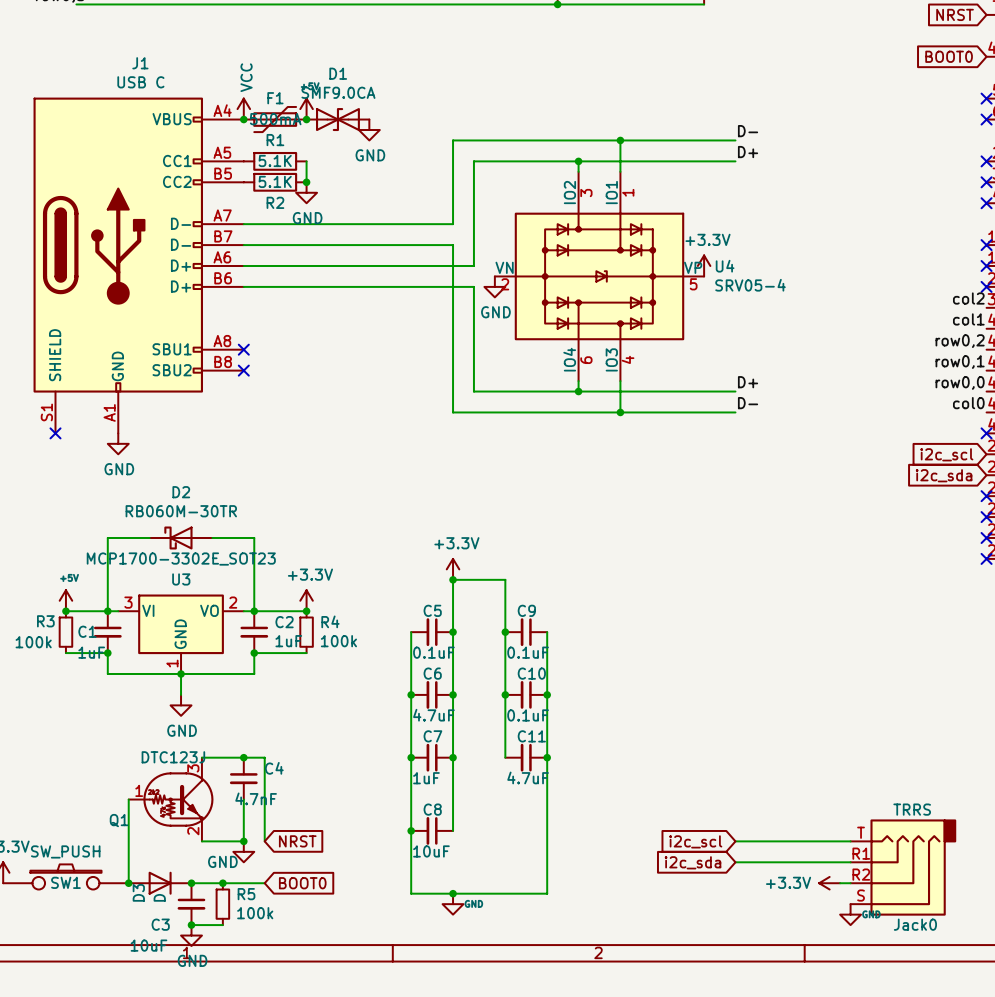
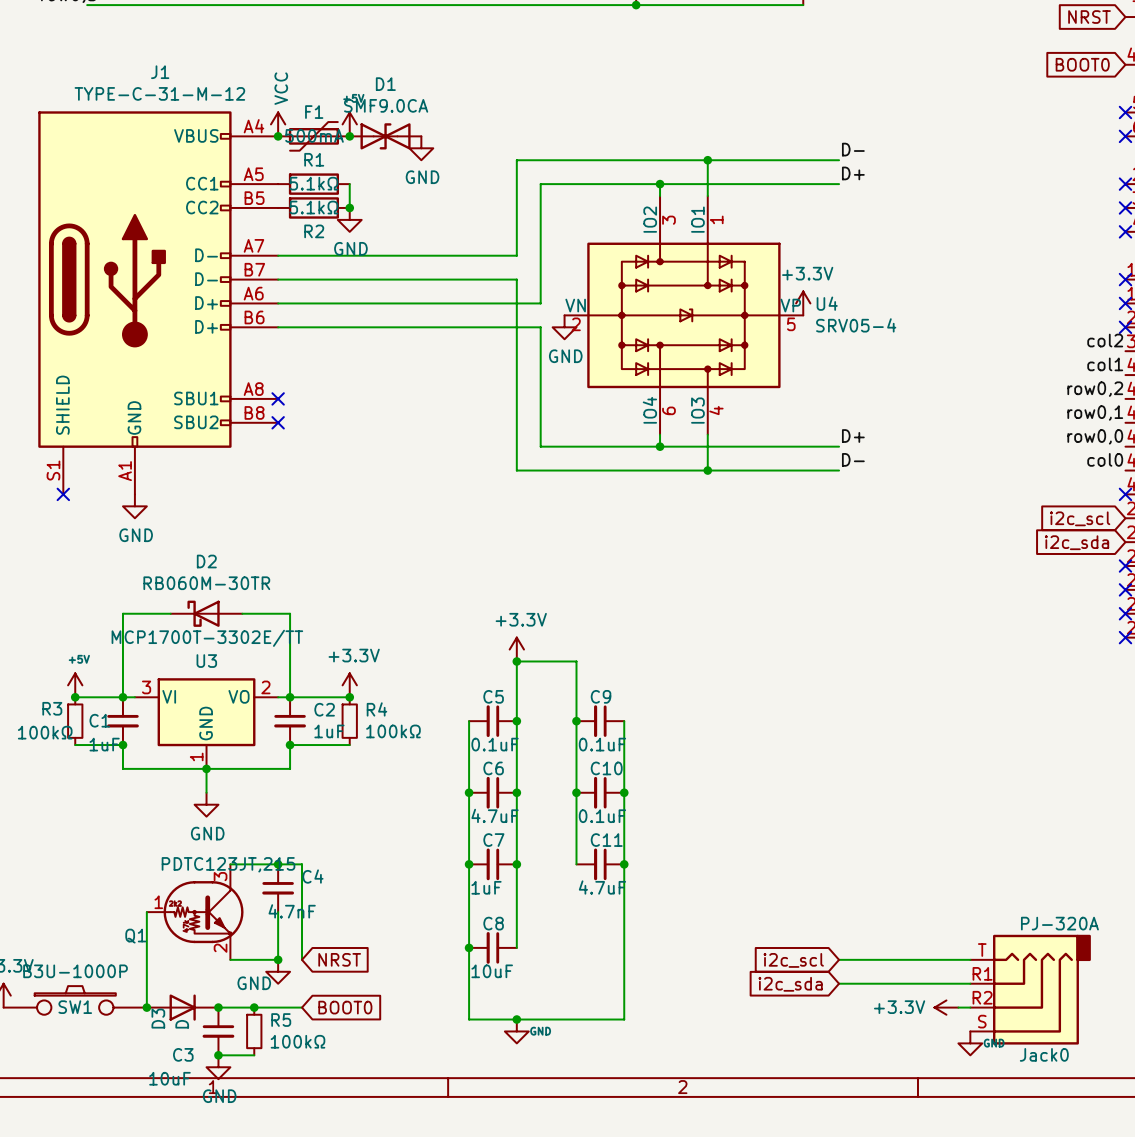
J1 value: USB C (140, 82) -> TYPE-C-31-M-12 (159, 93)
R1 value: 5.1K (275, 160) -> 5.1kΩ (313, 183)
R2 value: 5.1K (275, 181) -> 5.1kΩ (313, 207)
U3 value: MCP1700-3302E_SOT23 (181, 559) -> MCP1700T-3302E/TT (207, 638)
R4 value: 100k (338, 641) -> 100kΩ (393, 731)
R3 value: 100k (33, 642) -> 100kΩ (45, 732)
Q1 value: DTC123J (173, 757) -> PDTC123JT,215 (228, 864)
Jack0 value: TRRS (912, 809) -> PJ-320A (1059, 923)
SW1 value: SW_PUSH (65, 851) -> B3U-1000P (75, 971)
R5 value: 100k (255, 913) -> 100kΩ (297, 1041)

